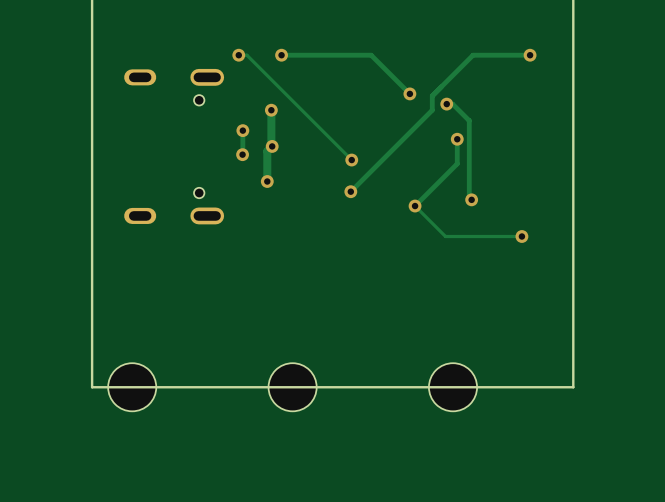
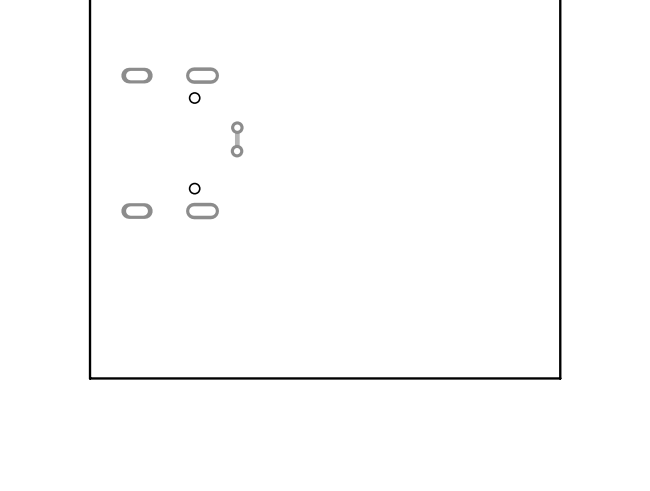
track: (238, 55) (246, 55) (351, 160) -> none
via: (238, 55) -> none
track: (281, 55) (371, 55) (409, 93) -> none
via: (281, 55) -> none
track: (530, 55) (473, 55) (432, 95) (432, 110) (350, 191) -> none
via: (530, 55) -> none
via: (409, 93) -> none
track: (446, 104) (452, 104) (469, 120) (469, 197) (471, 199) -> none
via: (446, 104) -> none
track: (271, 110) (272, 146) (267, 151) (267, 181) -> none
via: (271, 110) -> none
track: (457, 139) (457, 163) (415, 206) (445, 236) (521, 236) -> none
via: (457, 139) -> none
via: (272, 146) -> none
via: (351, 160) -> none
via: (267, 181) -> none
via: (350, 191) -> none
via: (471, 199) -> none
via: (415, 206) -> none
via: (521, 236) -> none
part: (132, 387) -> none
part: (292, 387) -> none
part: (453, 387) -> none

